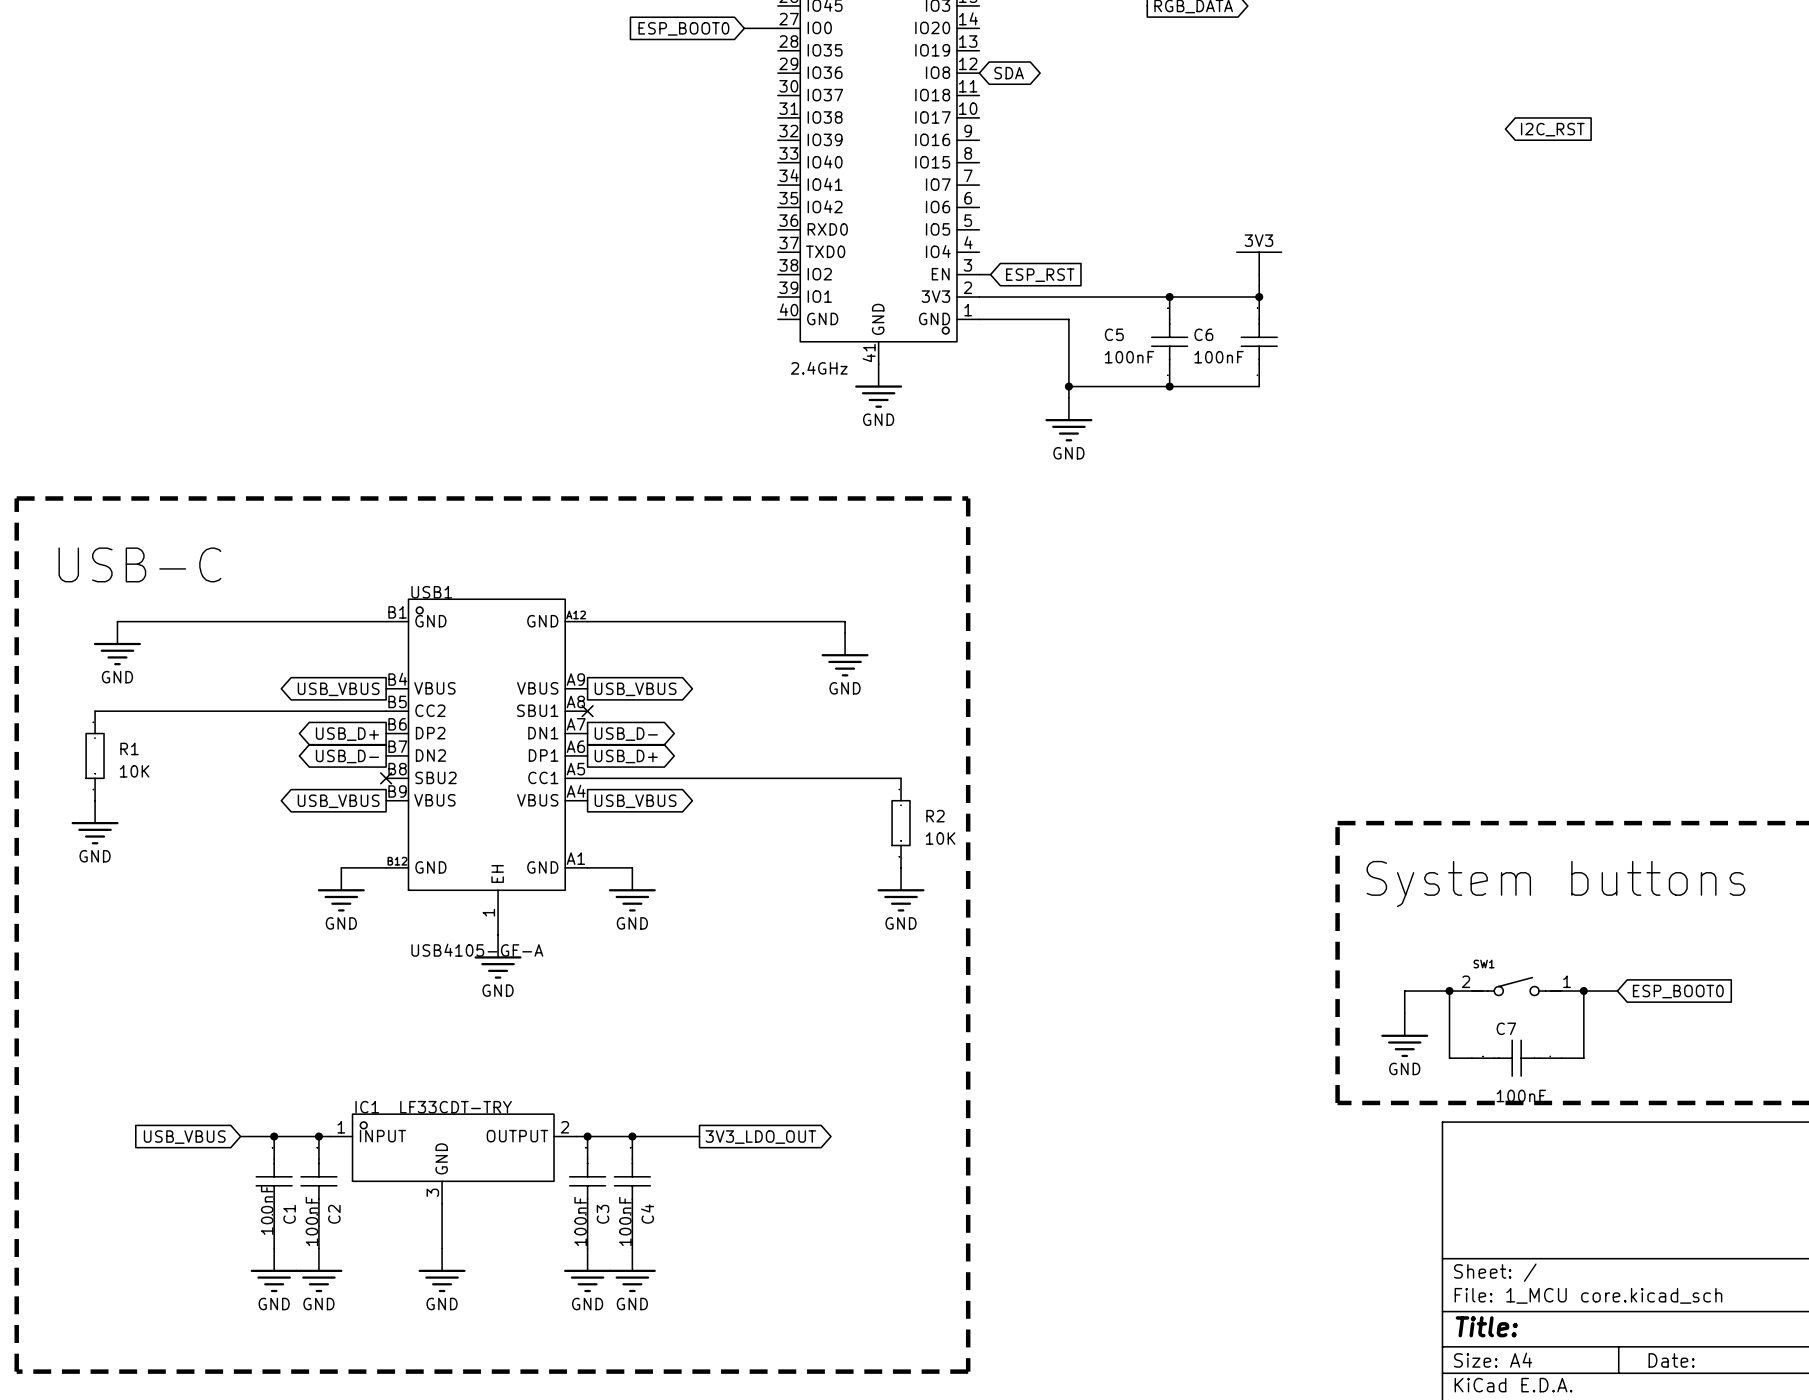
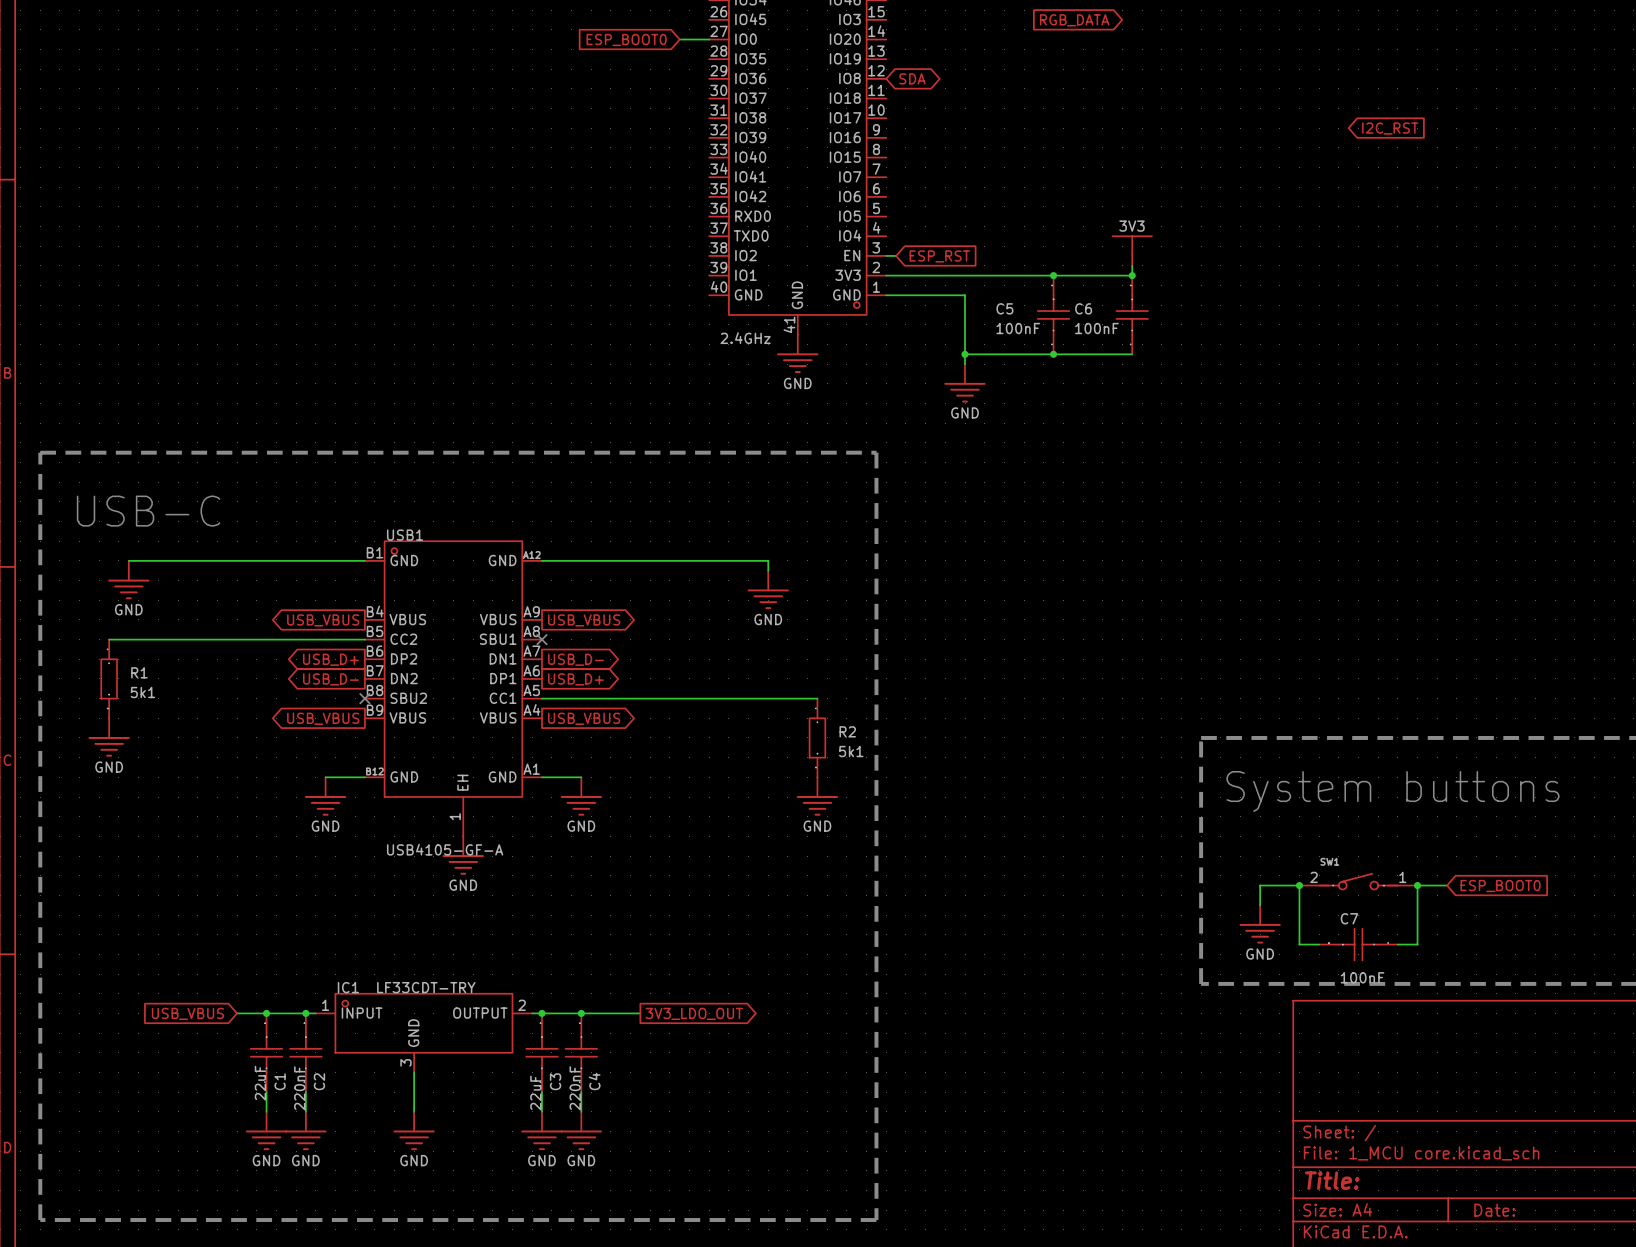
R1 value: 10K (134, 771) -> 5k1 (142, 692)
R2 value: 10K (940, 838) -> 5k1 (851, 751)
C1 value: 100nF (267, 1210) -> 22uF (260, 1083)
C2 value: 100nF (311, 1221) -> 220nF (299, 1088)
C3 value: 100nF (580, 1221) -> 22uF (535, 1092)
C4 value: 100nF (625, 1221) -> 220nF (575, 1088)

